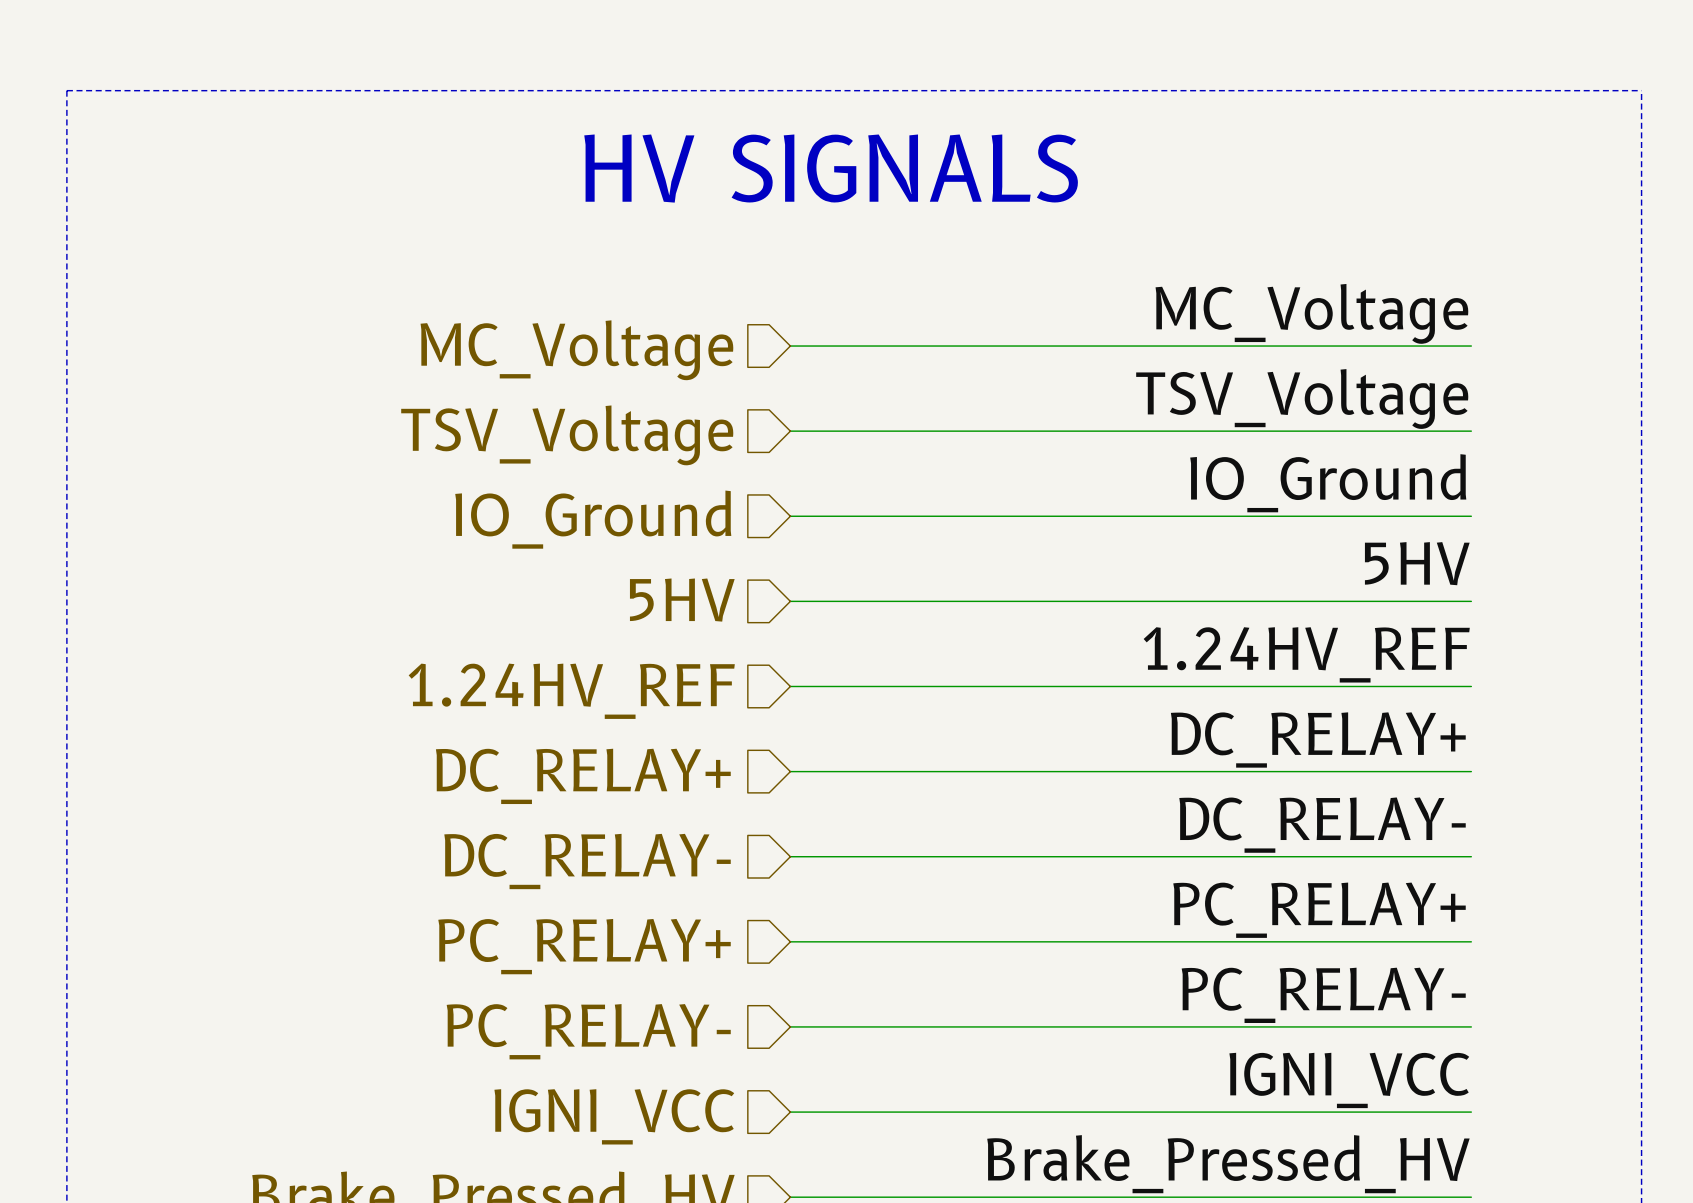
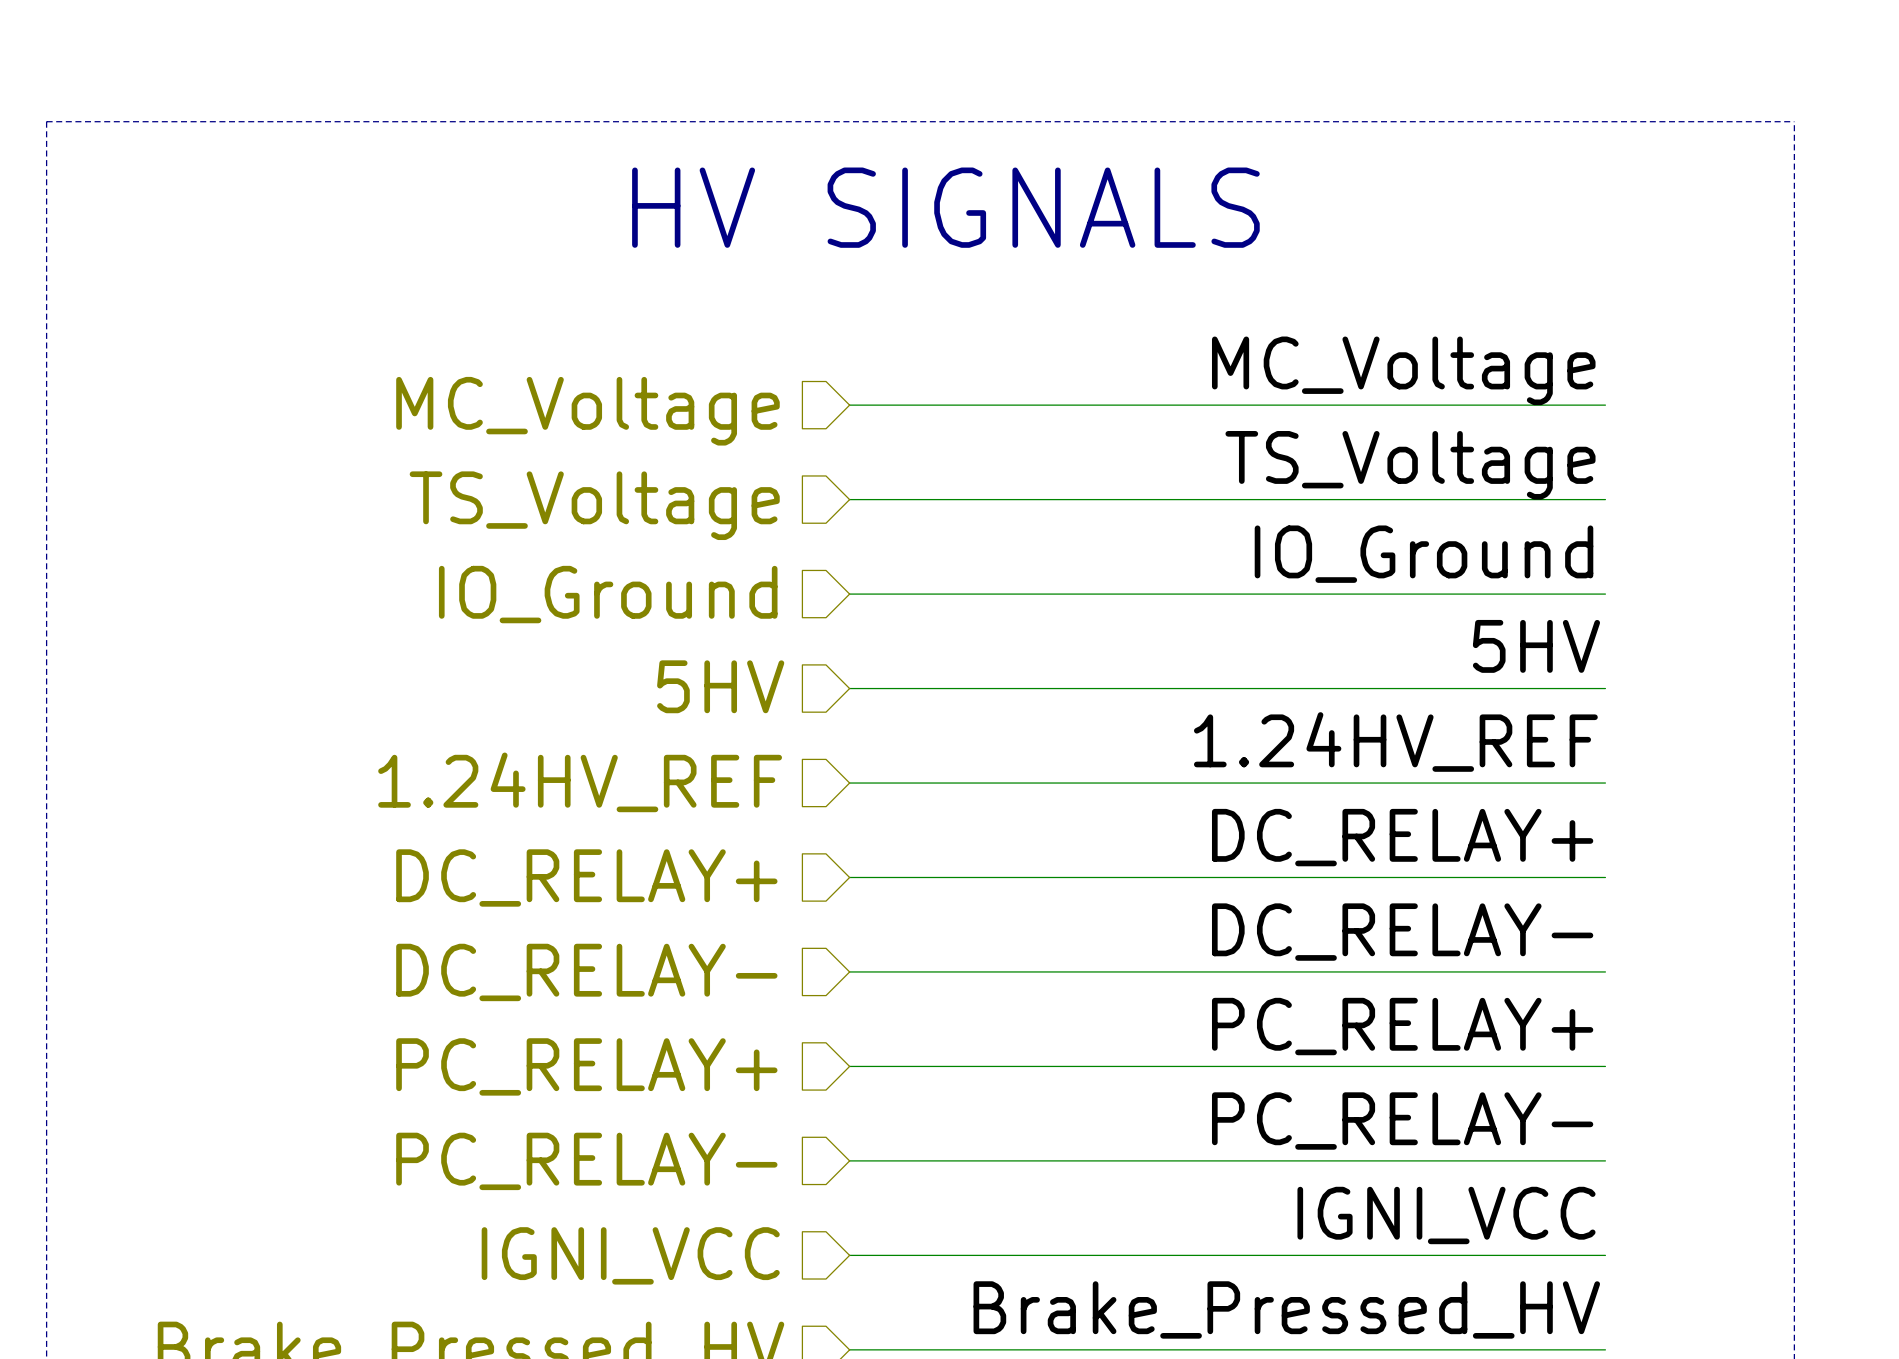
label: TSV_Voltage (1302, 398) -> TS_Voltage (1410, 465)
hierarchical label: TSV_Voltage (567, 435) -> TS_Voltage (594, 505)

